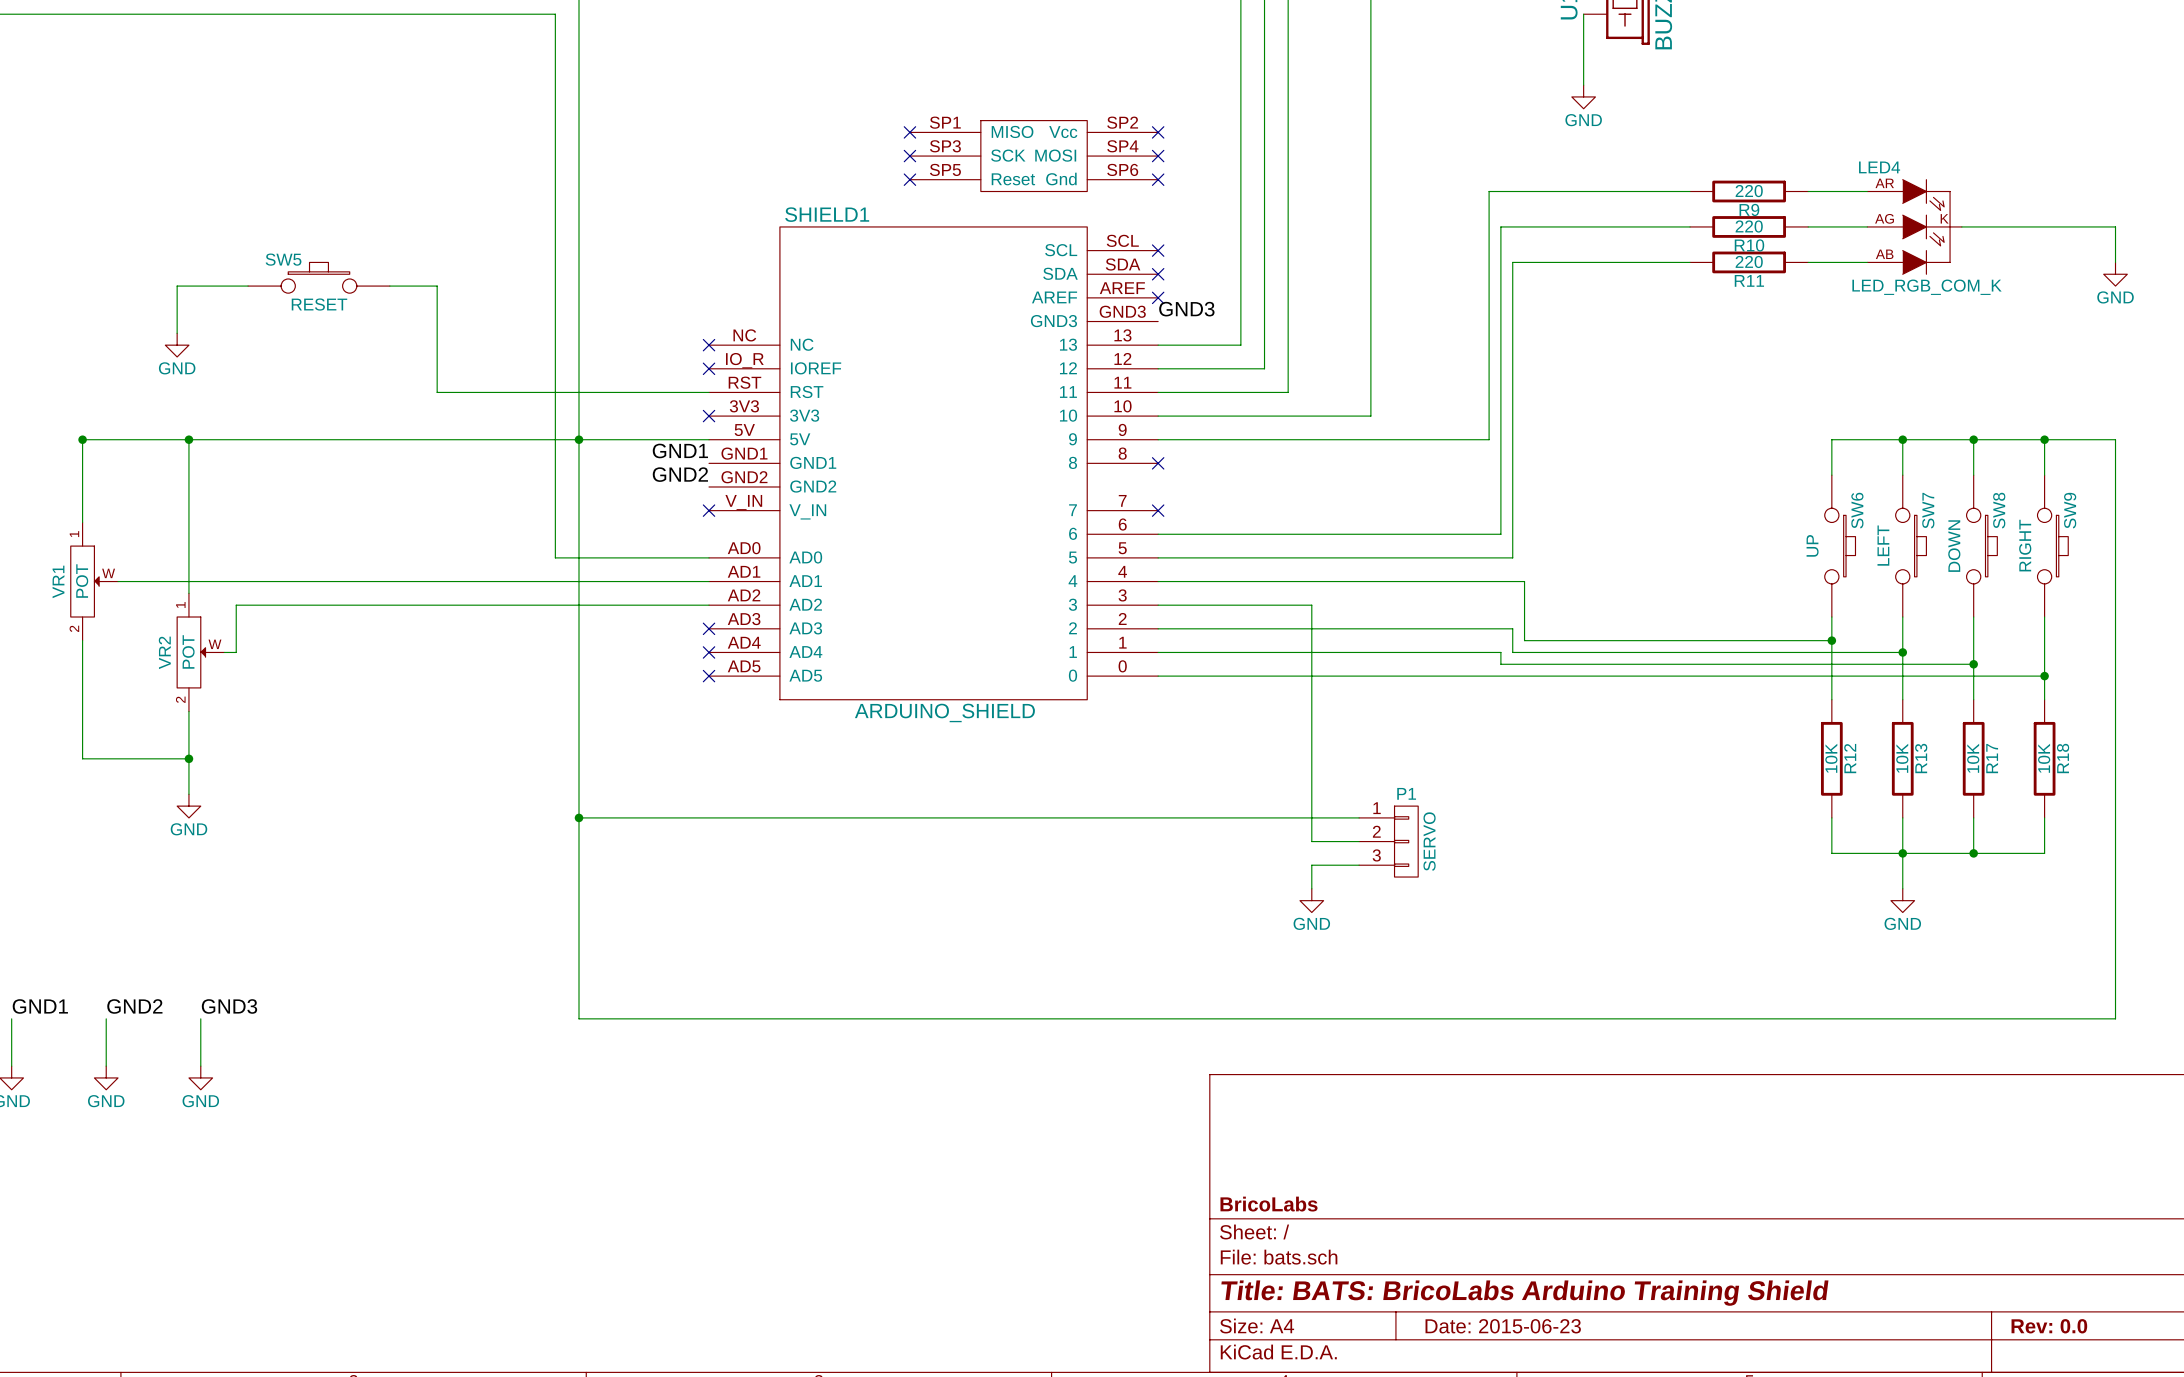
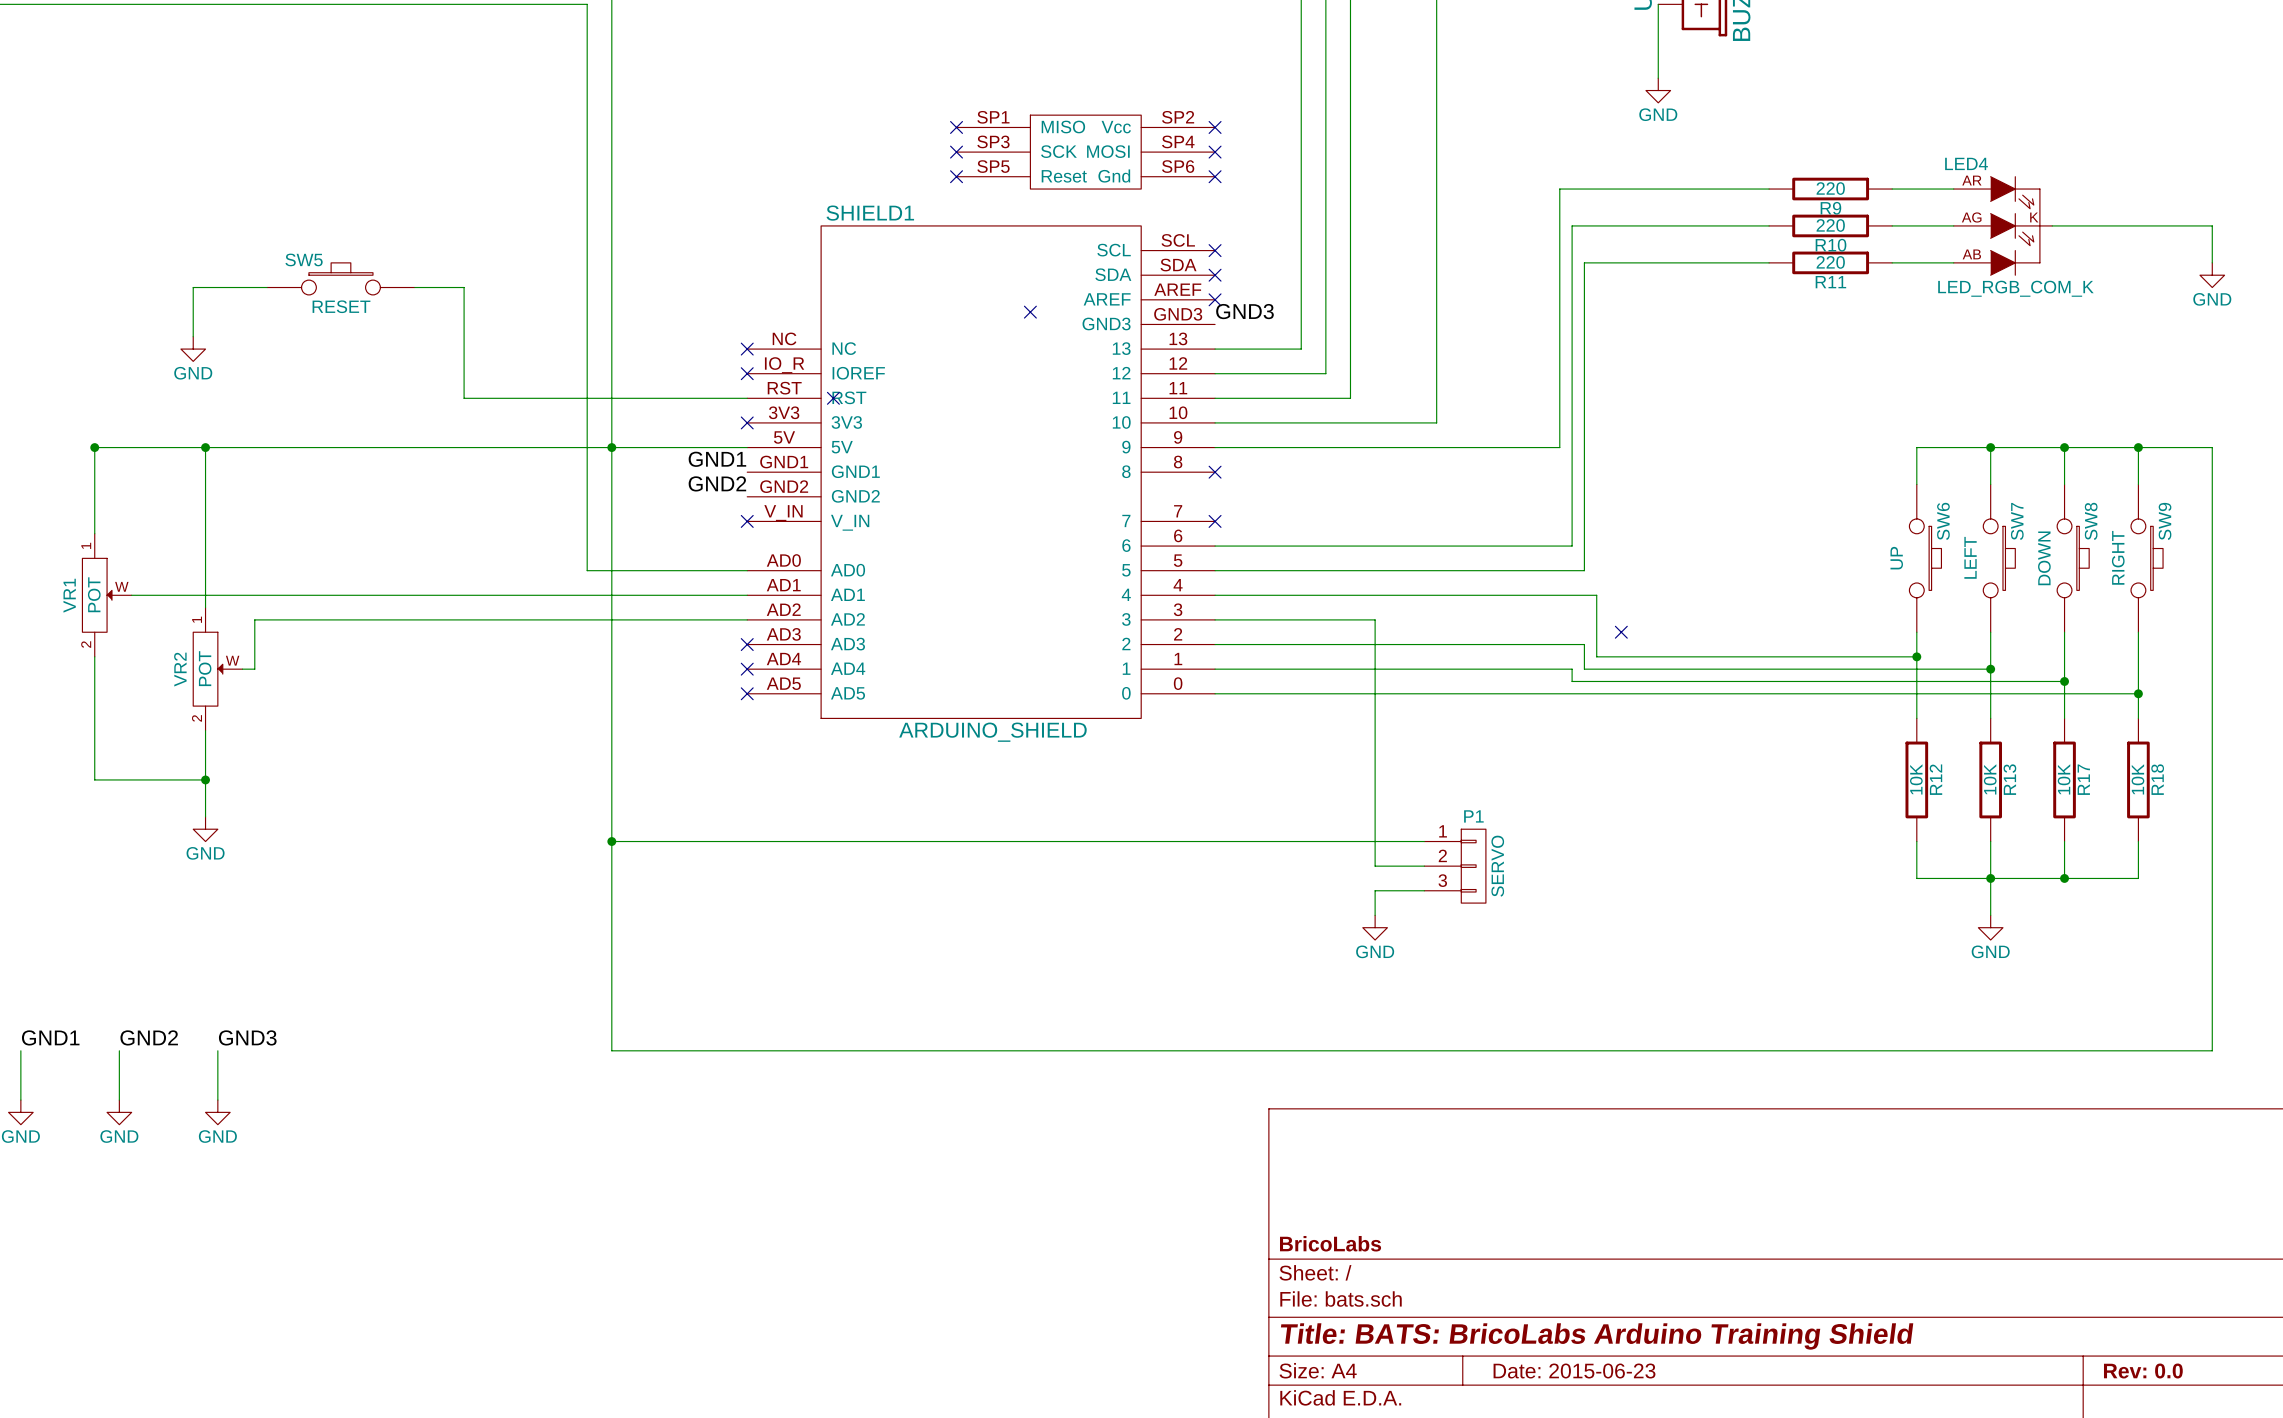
no-connect mark: none -> (1030, 312)
no-connect mark: none -> (833, 398)
no-connect mark: none -> (1621, 632)

